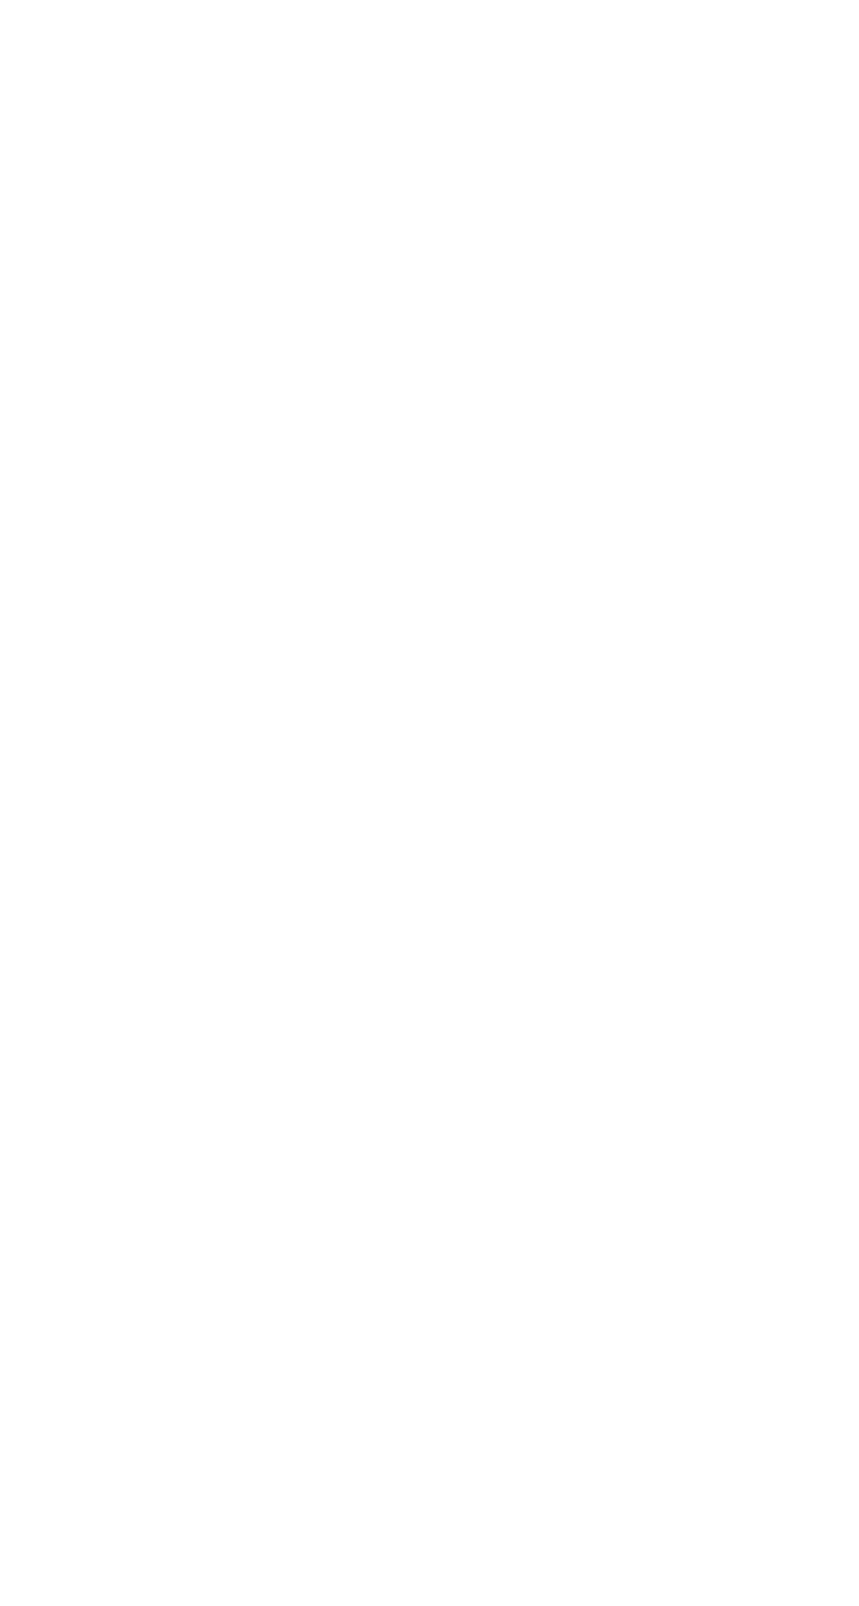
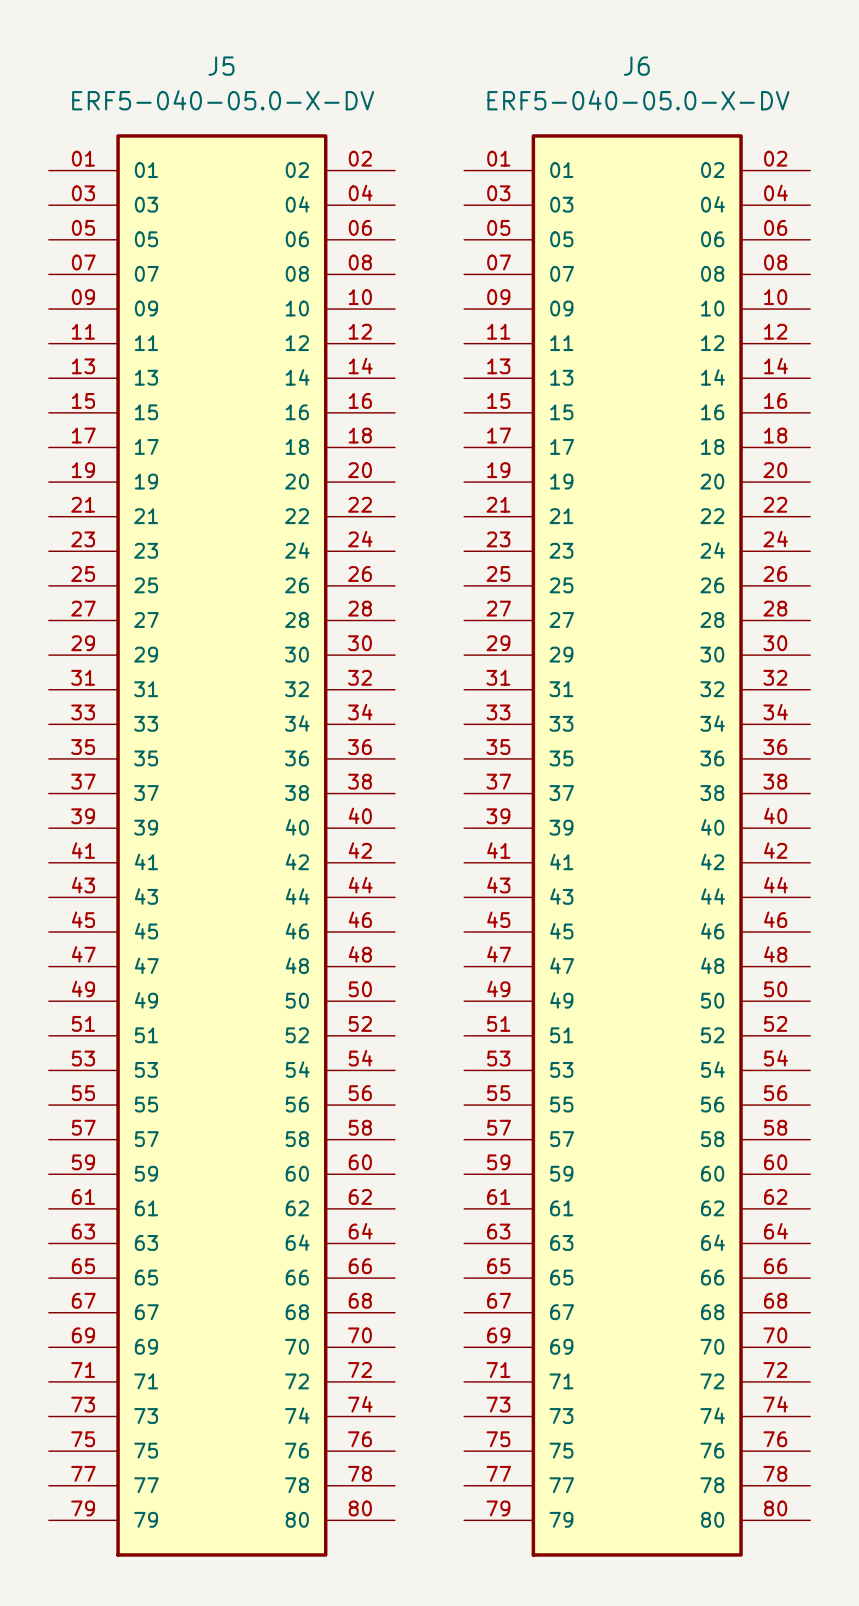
J5: none -> ERF5-040-05.0-X-DV (221, 845)
J6: none -> ERF5-040-05.0-X-DV (637, 845)

